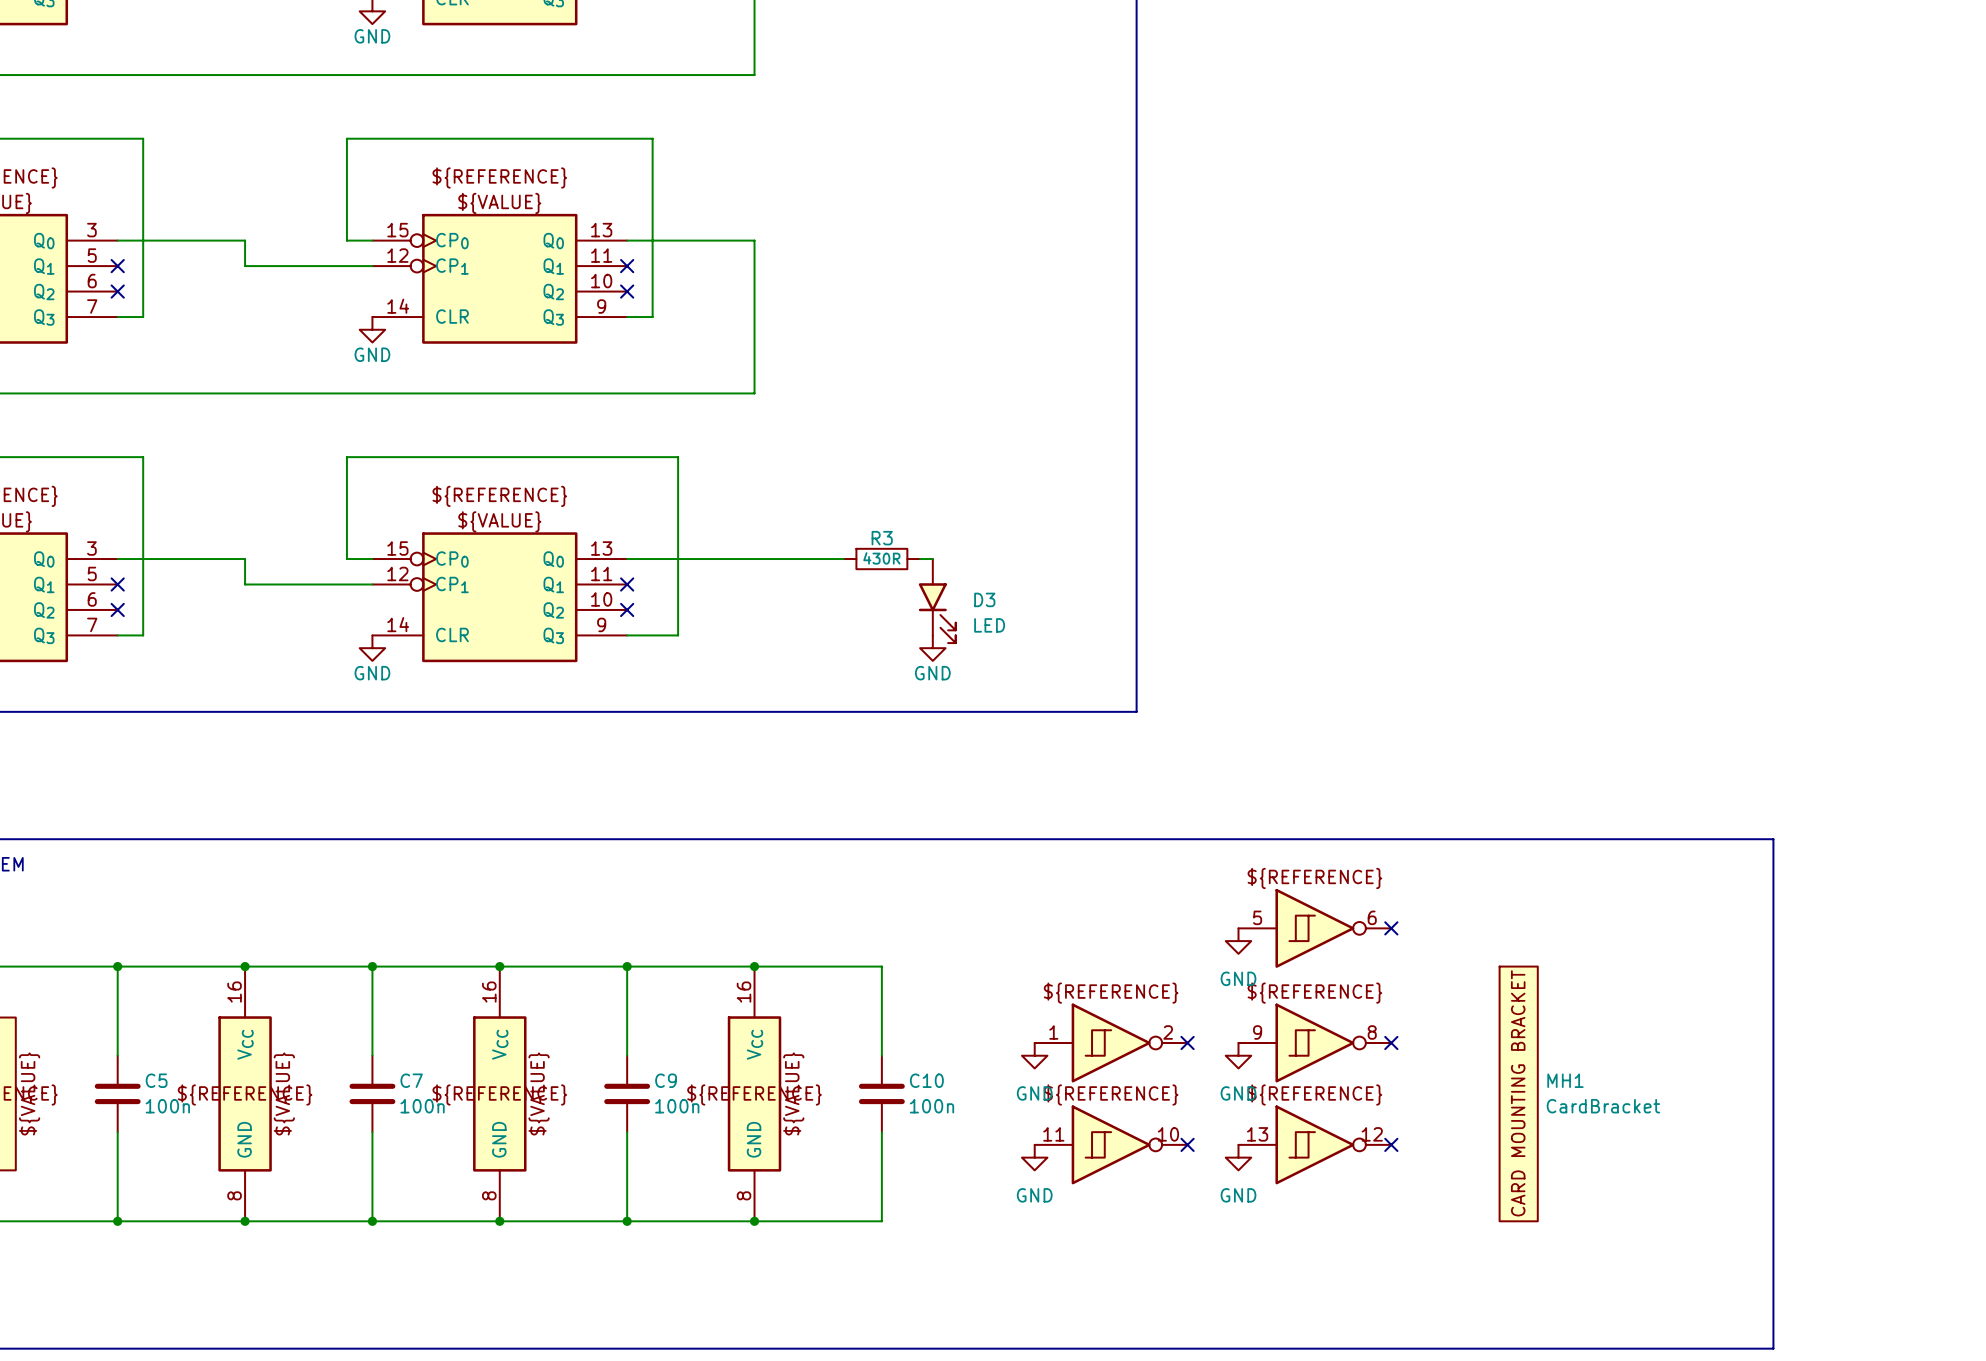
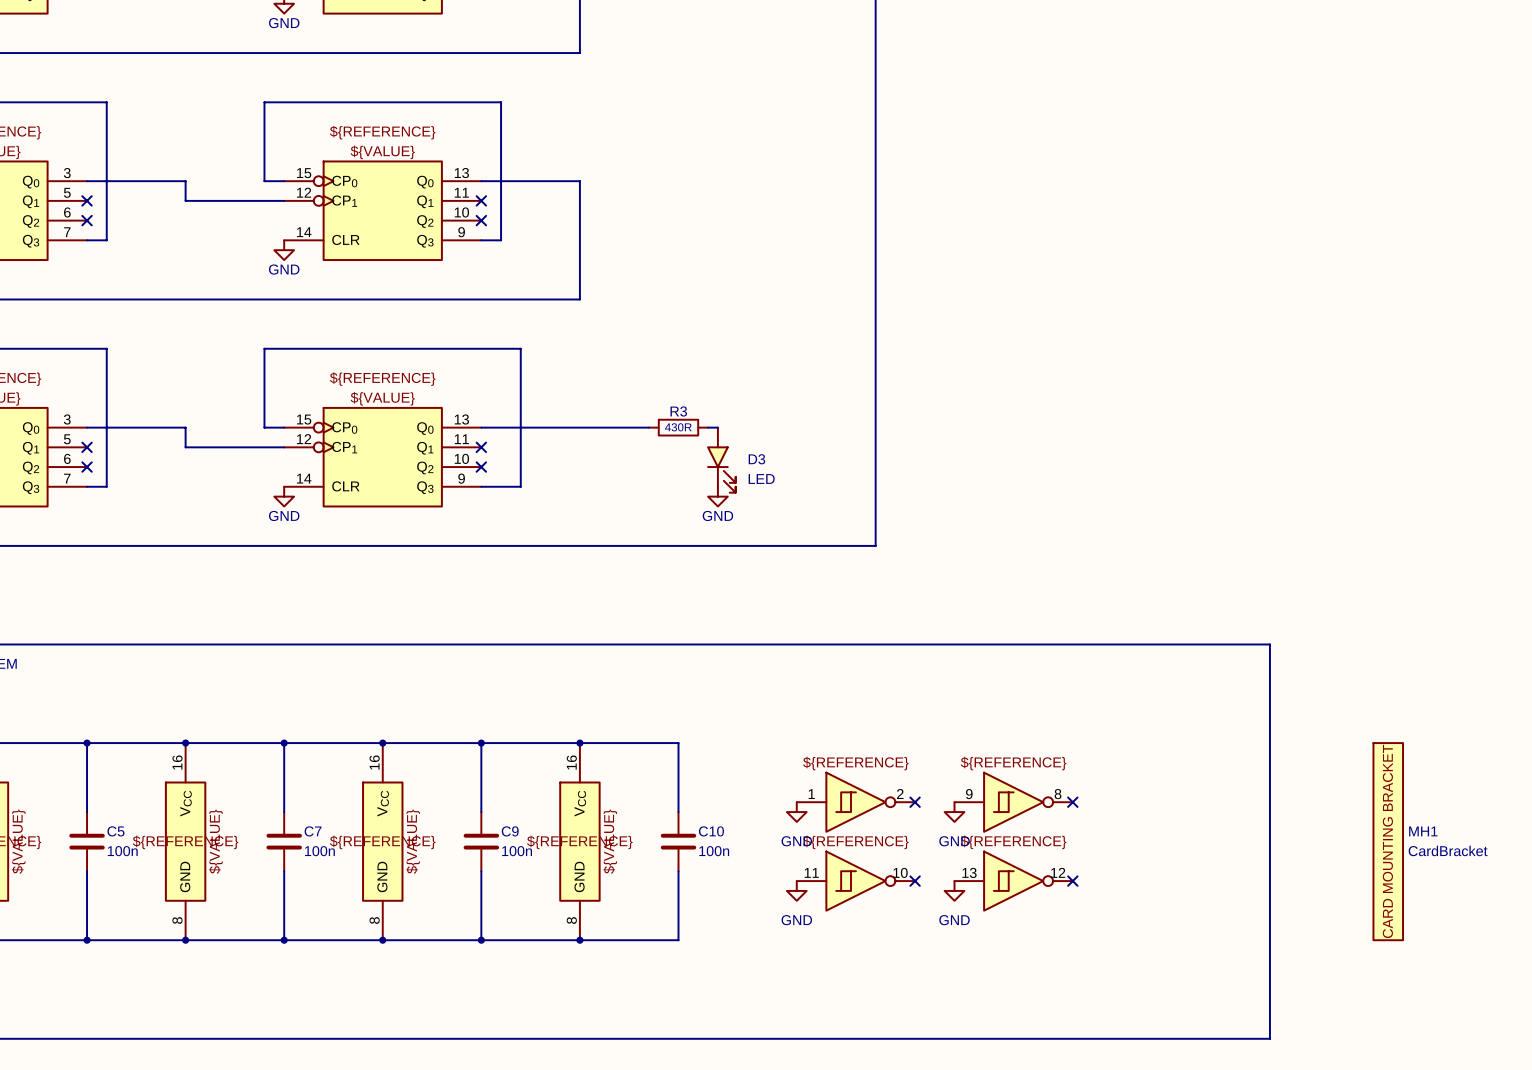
line: (1646, 839) (1773, 839) (1773, 1348) (1646, 1348) -> (1269, 644) (1269, 1038)
part: (1314, 928) -> none
no-connect mark: (1391, 928) -> none
power symbol: GND (1238, 941) -> none
MH1 position: (1518, 1093) -> (1388, 841)

